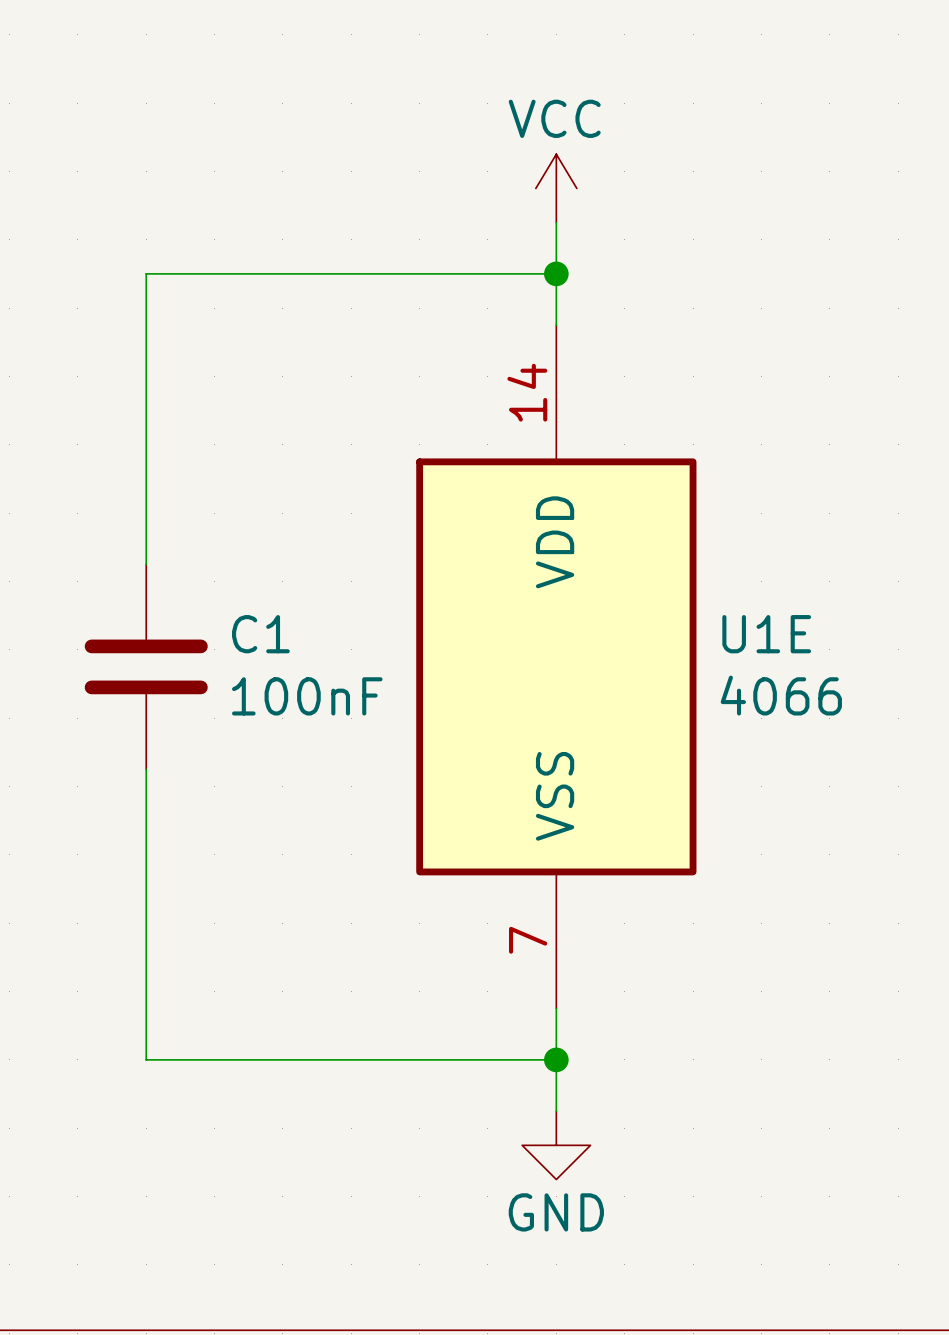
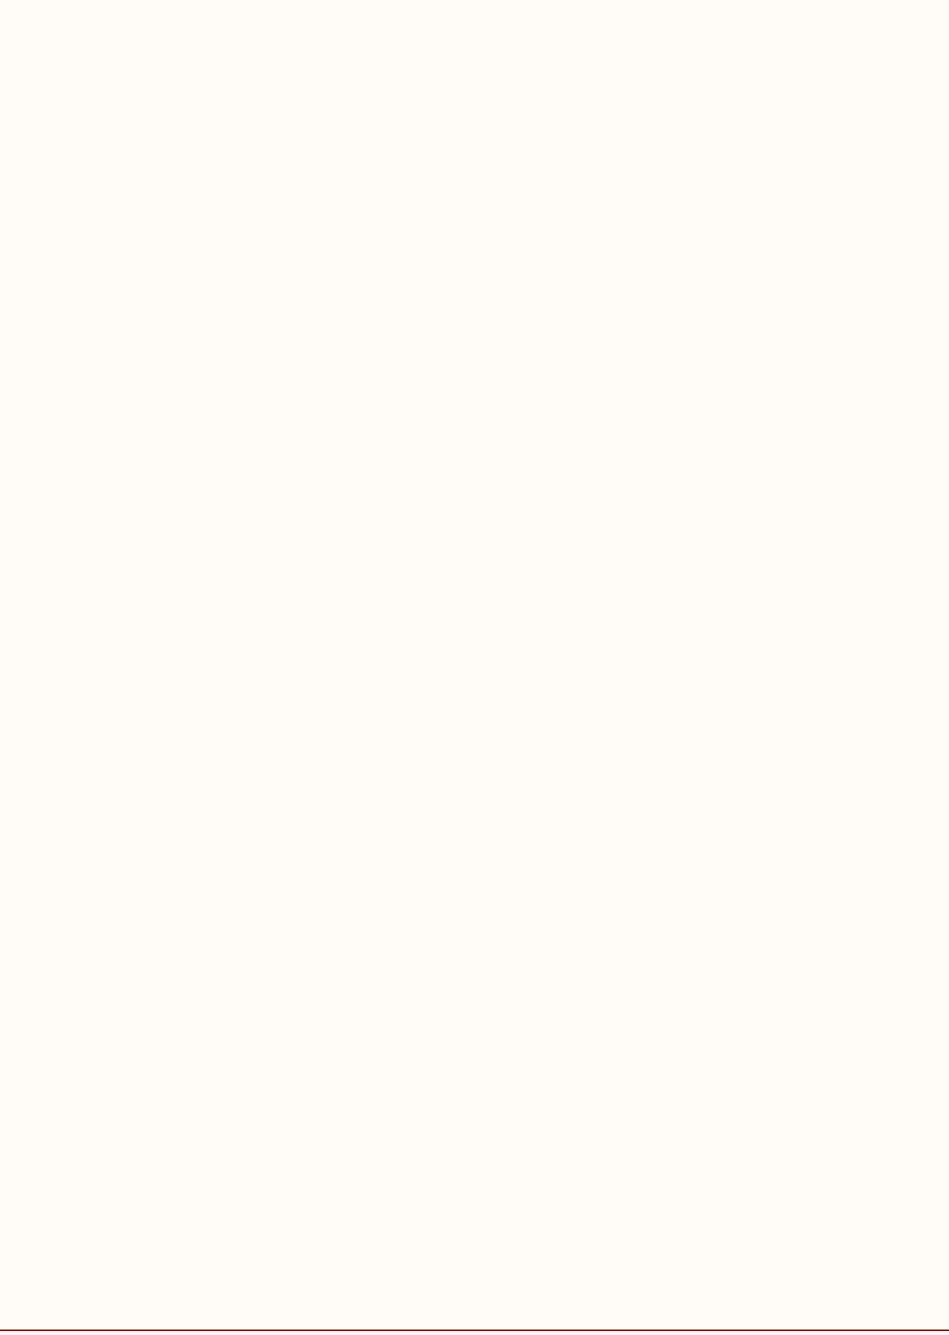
power symbol: VCC (556, 188) -> none
wire: (556, 222) (556, 325) -> none
wire: (556, 273) (146, 273) (146, 564) -> none
junction: (556, 273) -> none
C1: 100nF (146, 666) -> none
U1E: 4066 (556, 666) -> none
wire: (146, 769) (146, 1059) (556, 1059) -> none
wire: (556, 1008) (556, 1111) -> none
junction: (556, 1059) -> none
power symbol: GND (556, 1145) -> none

